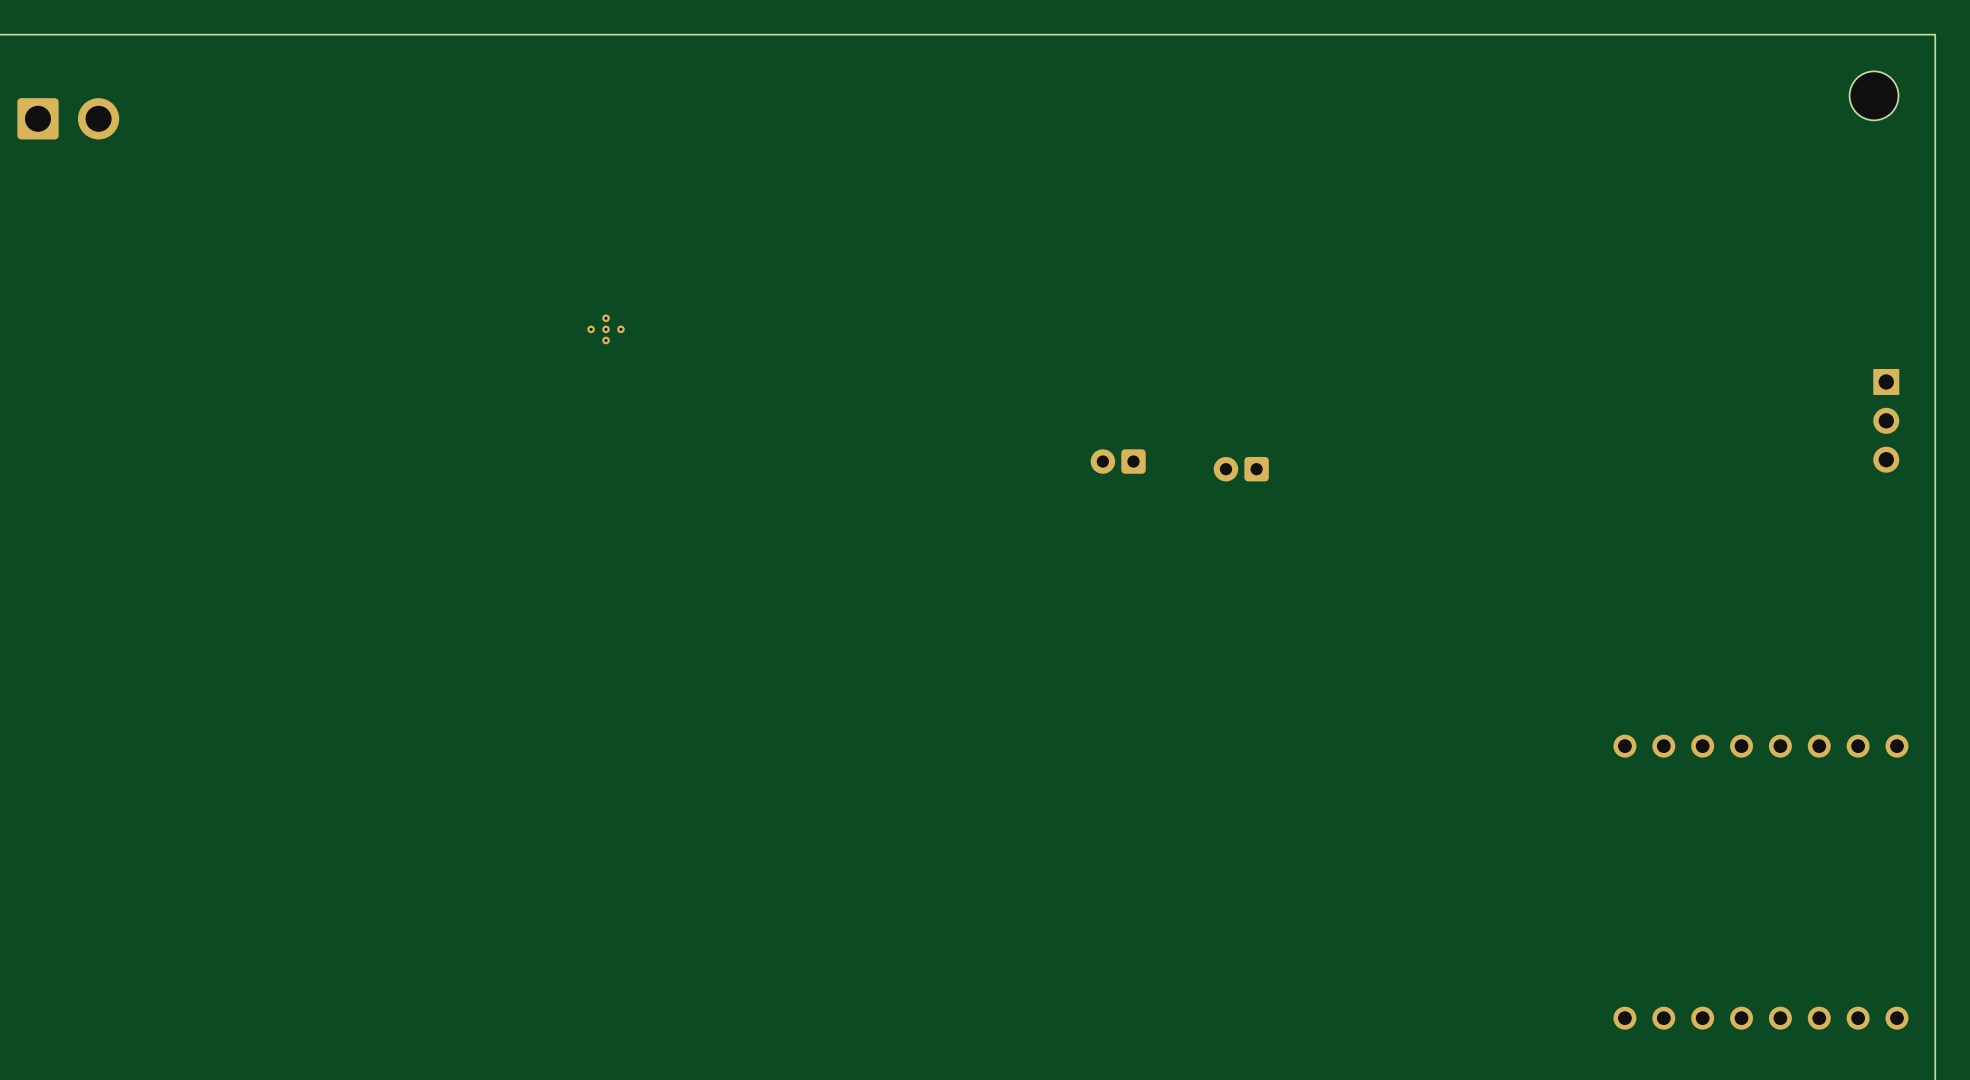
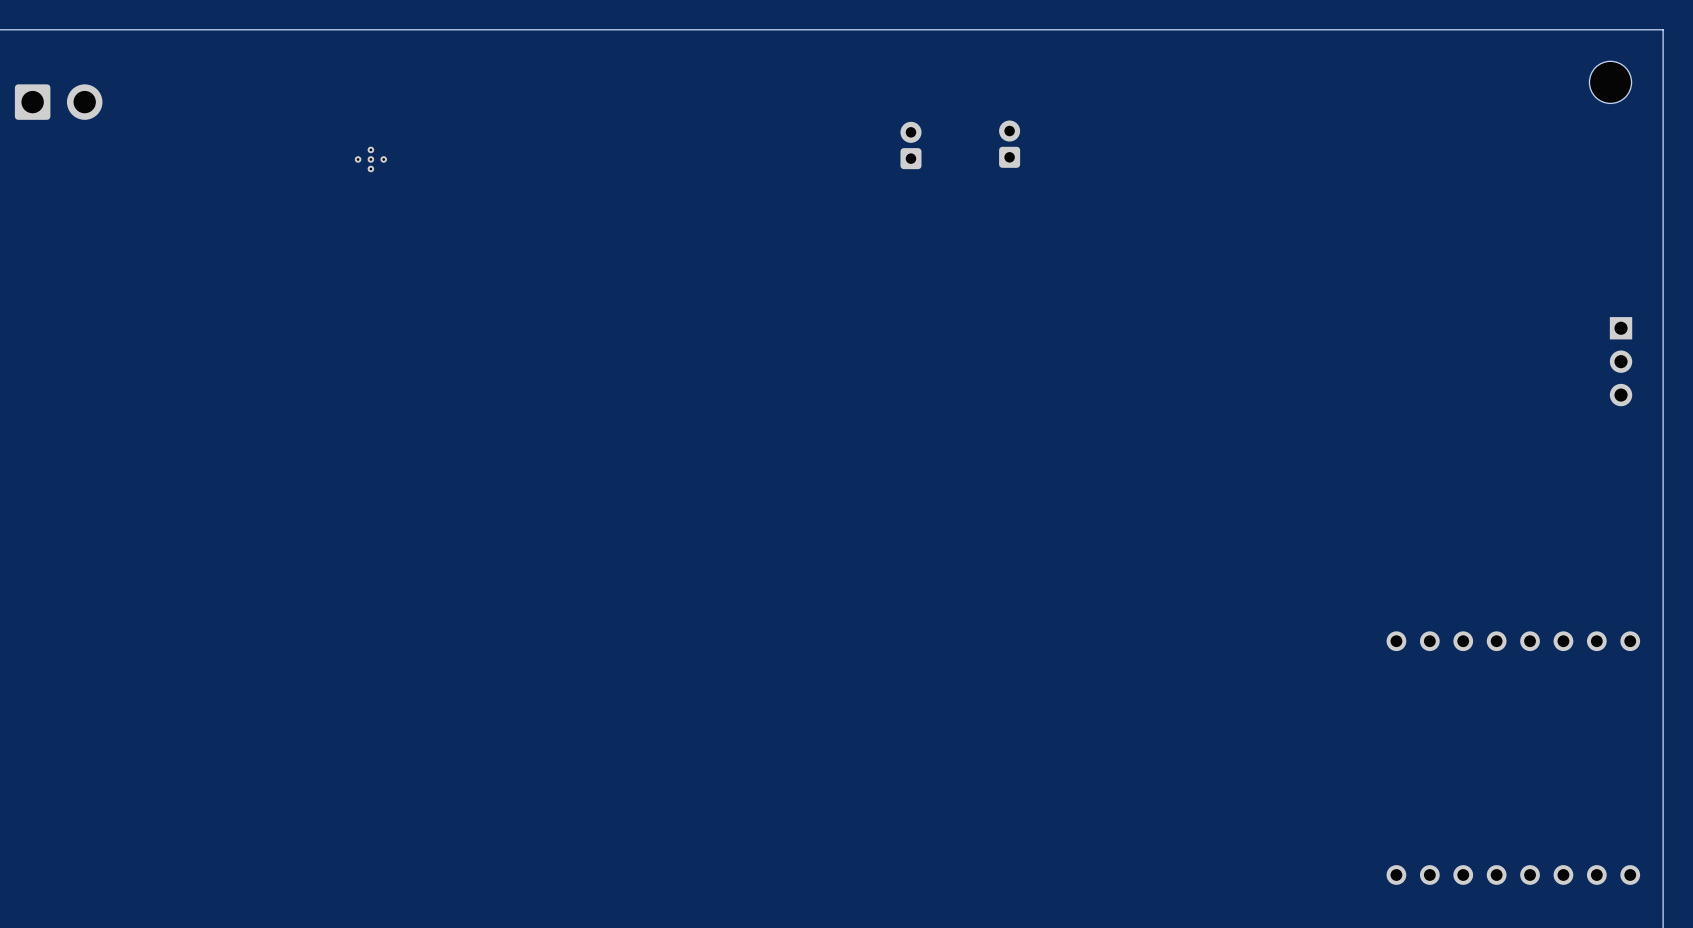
part: none -> (1009, 144)
part: none -> (910, 145)
part position: (606, 329) -> (370, 159)
part: (1118, 461) -> none
part: (1241, 469) -> none

